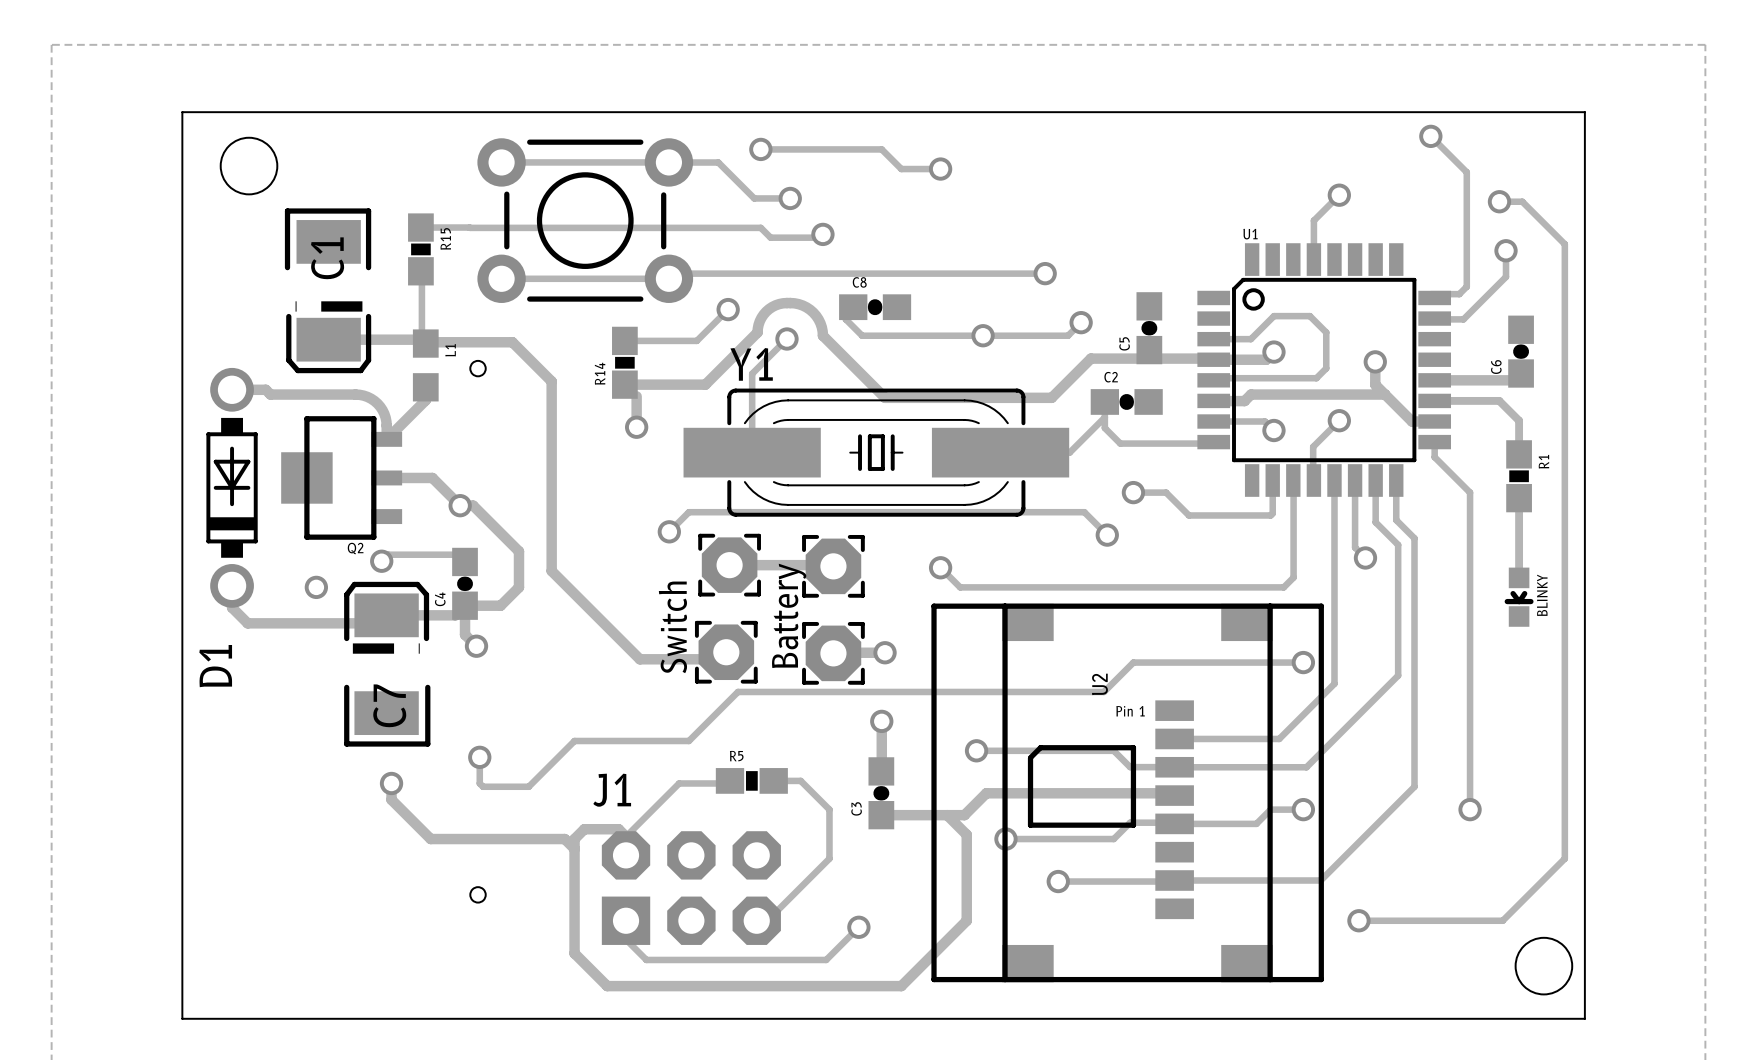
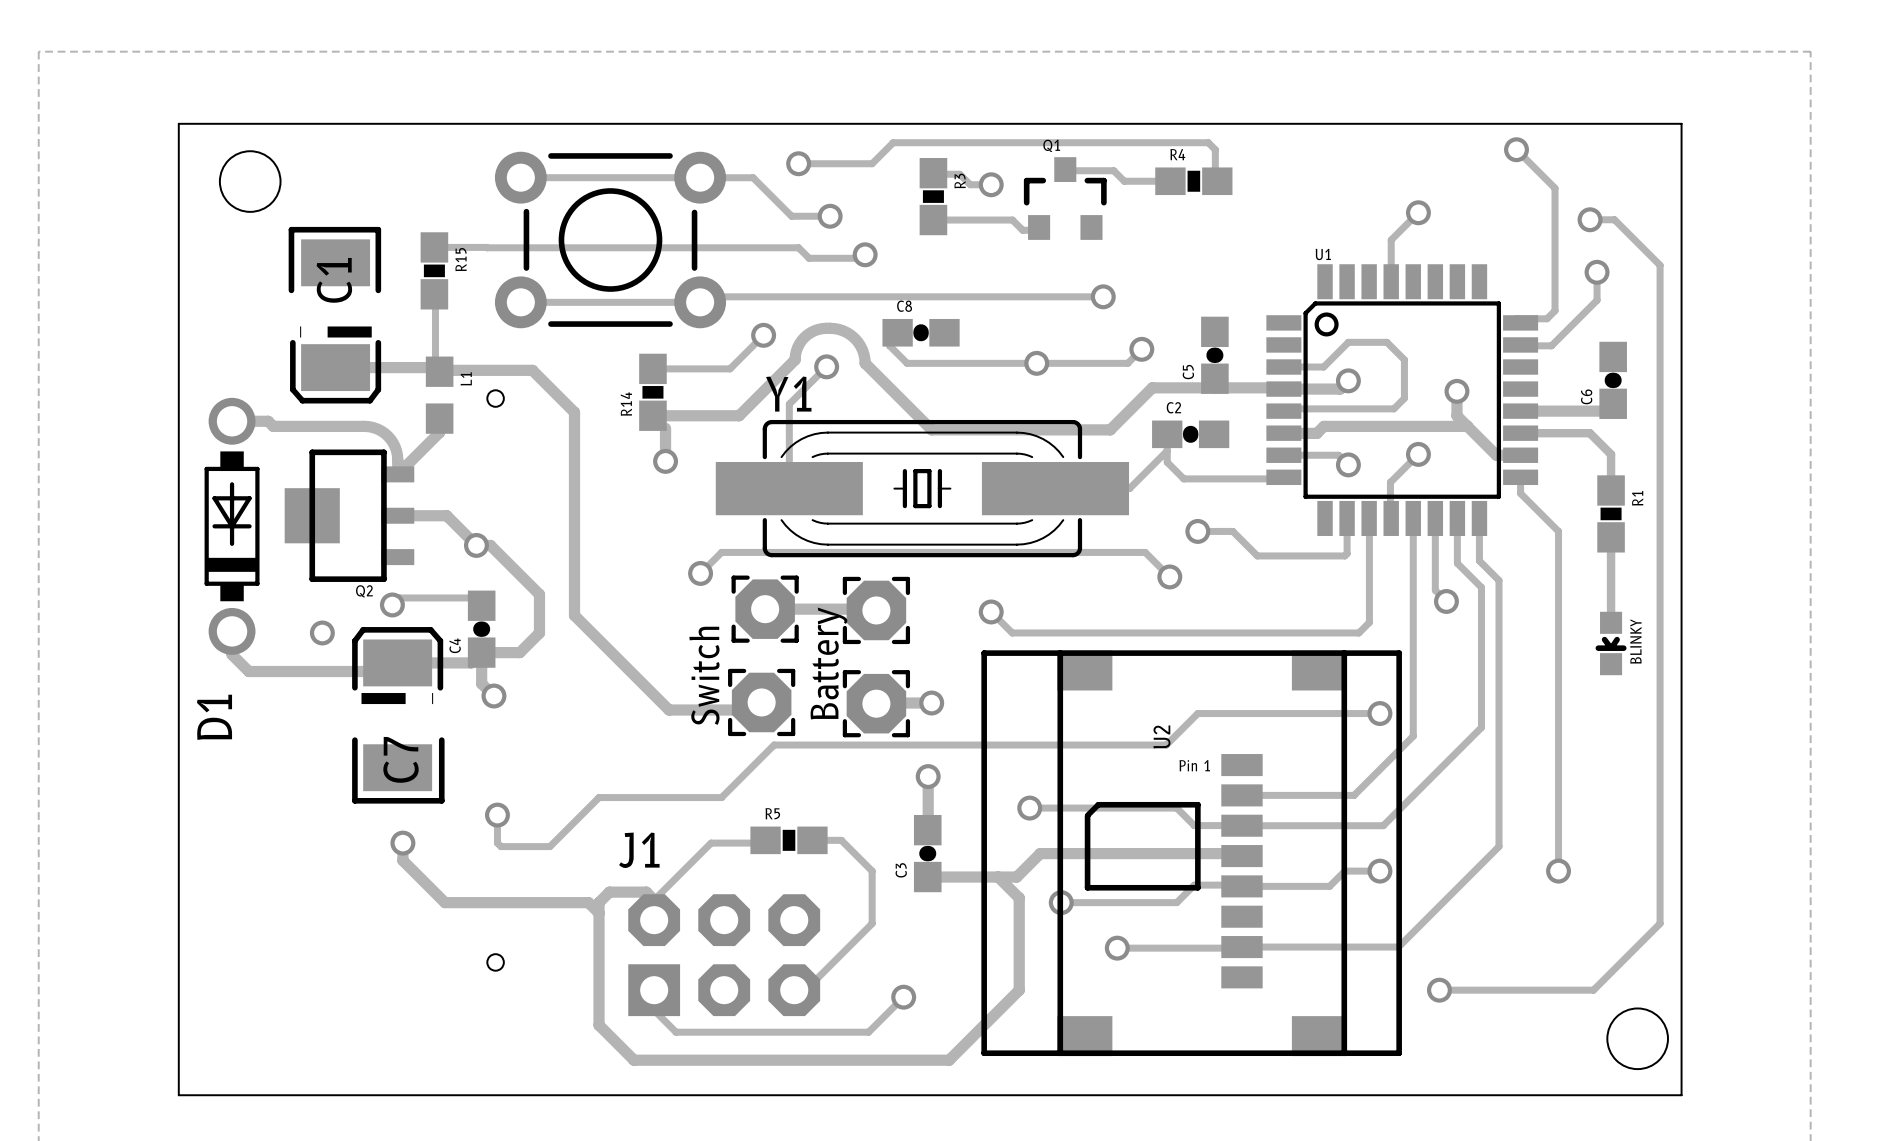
track: (829, 149) (881, 149) (901, 169) (920, 169) -> (933, 173) (959, 174) (970, 184)
track: none -> (872, 163) (893, 142) (1208, 142) (1215, 149) (1215, 179) (1217, 181)
track: none -> (1071, 163) (1065, 169) (1066, 170) (1113, 170) (1124, 181) (1170, 181)
R4: none -> (1193, 181)
R3: none -> (933, 196)
Q1: none -> (1065, 198)
track: none -> (933, 220) (1012, 220) (1022, 230) (1036, 230) (1039, 227) (1031, 220)

